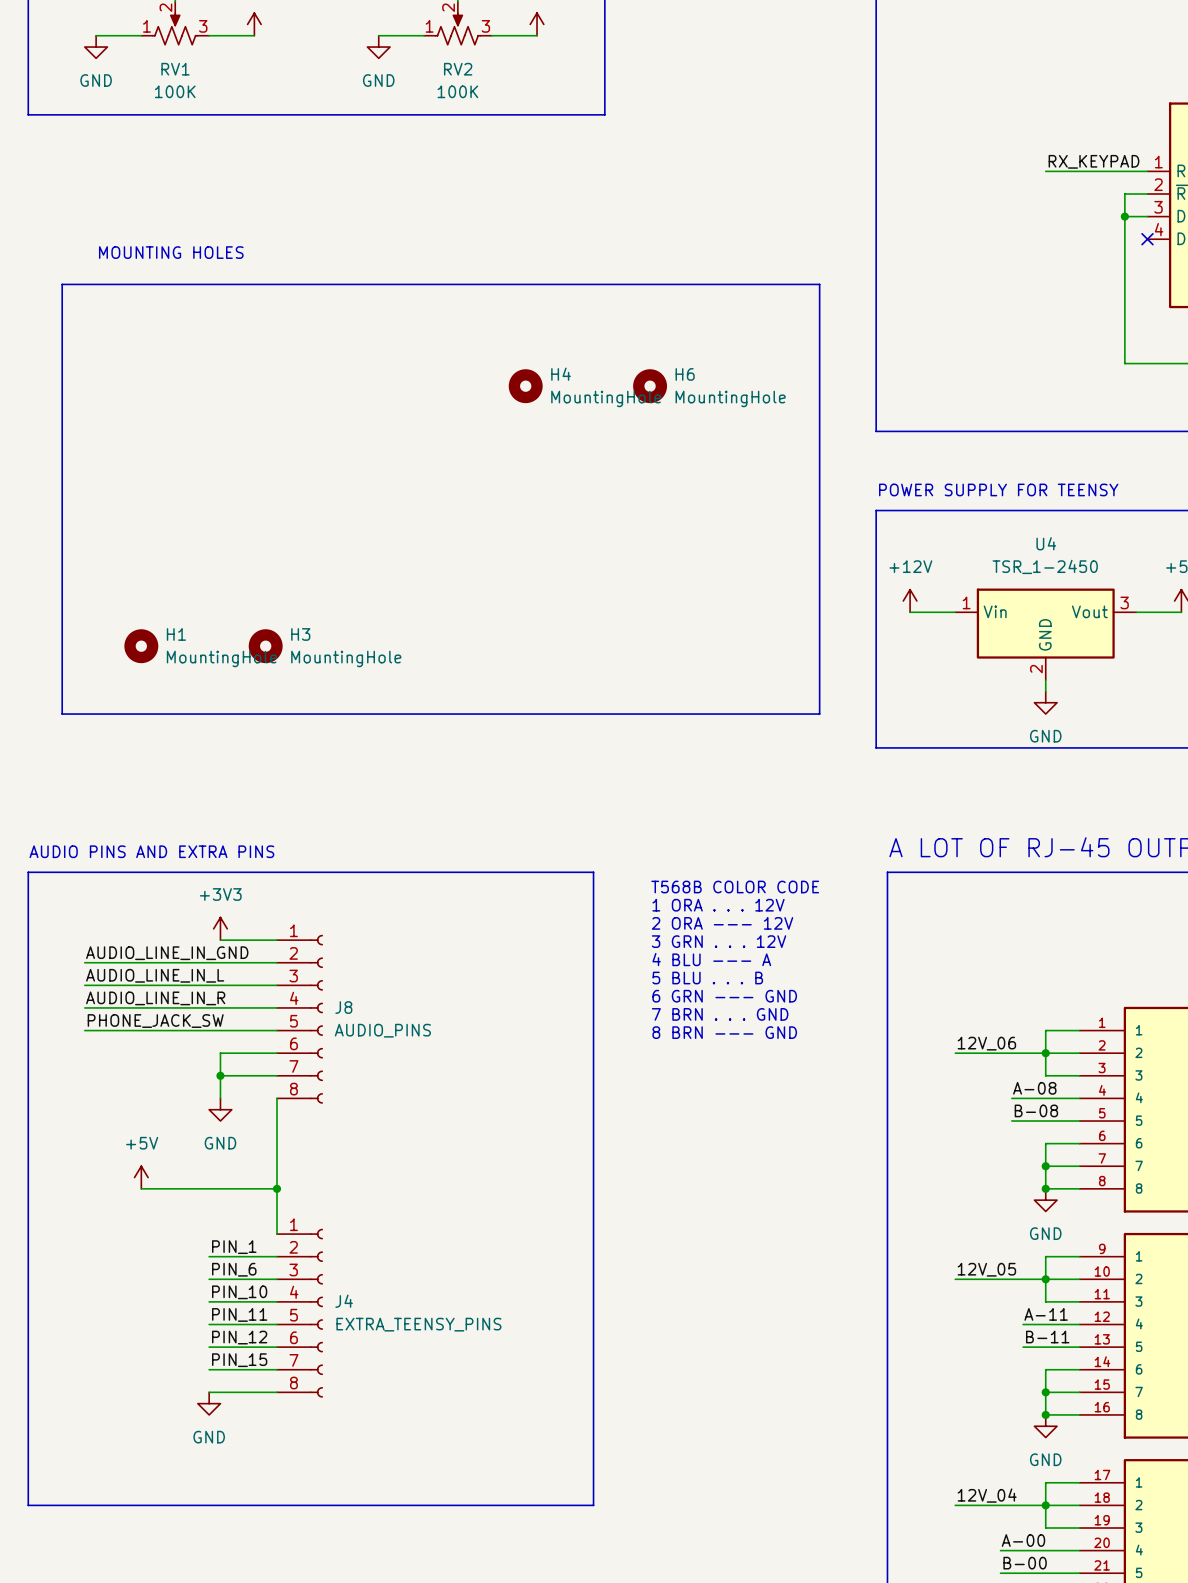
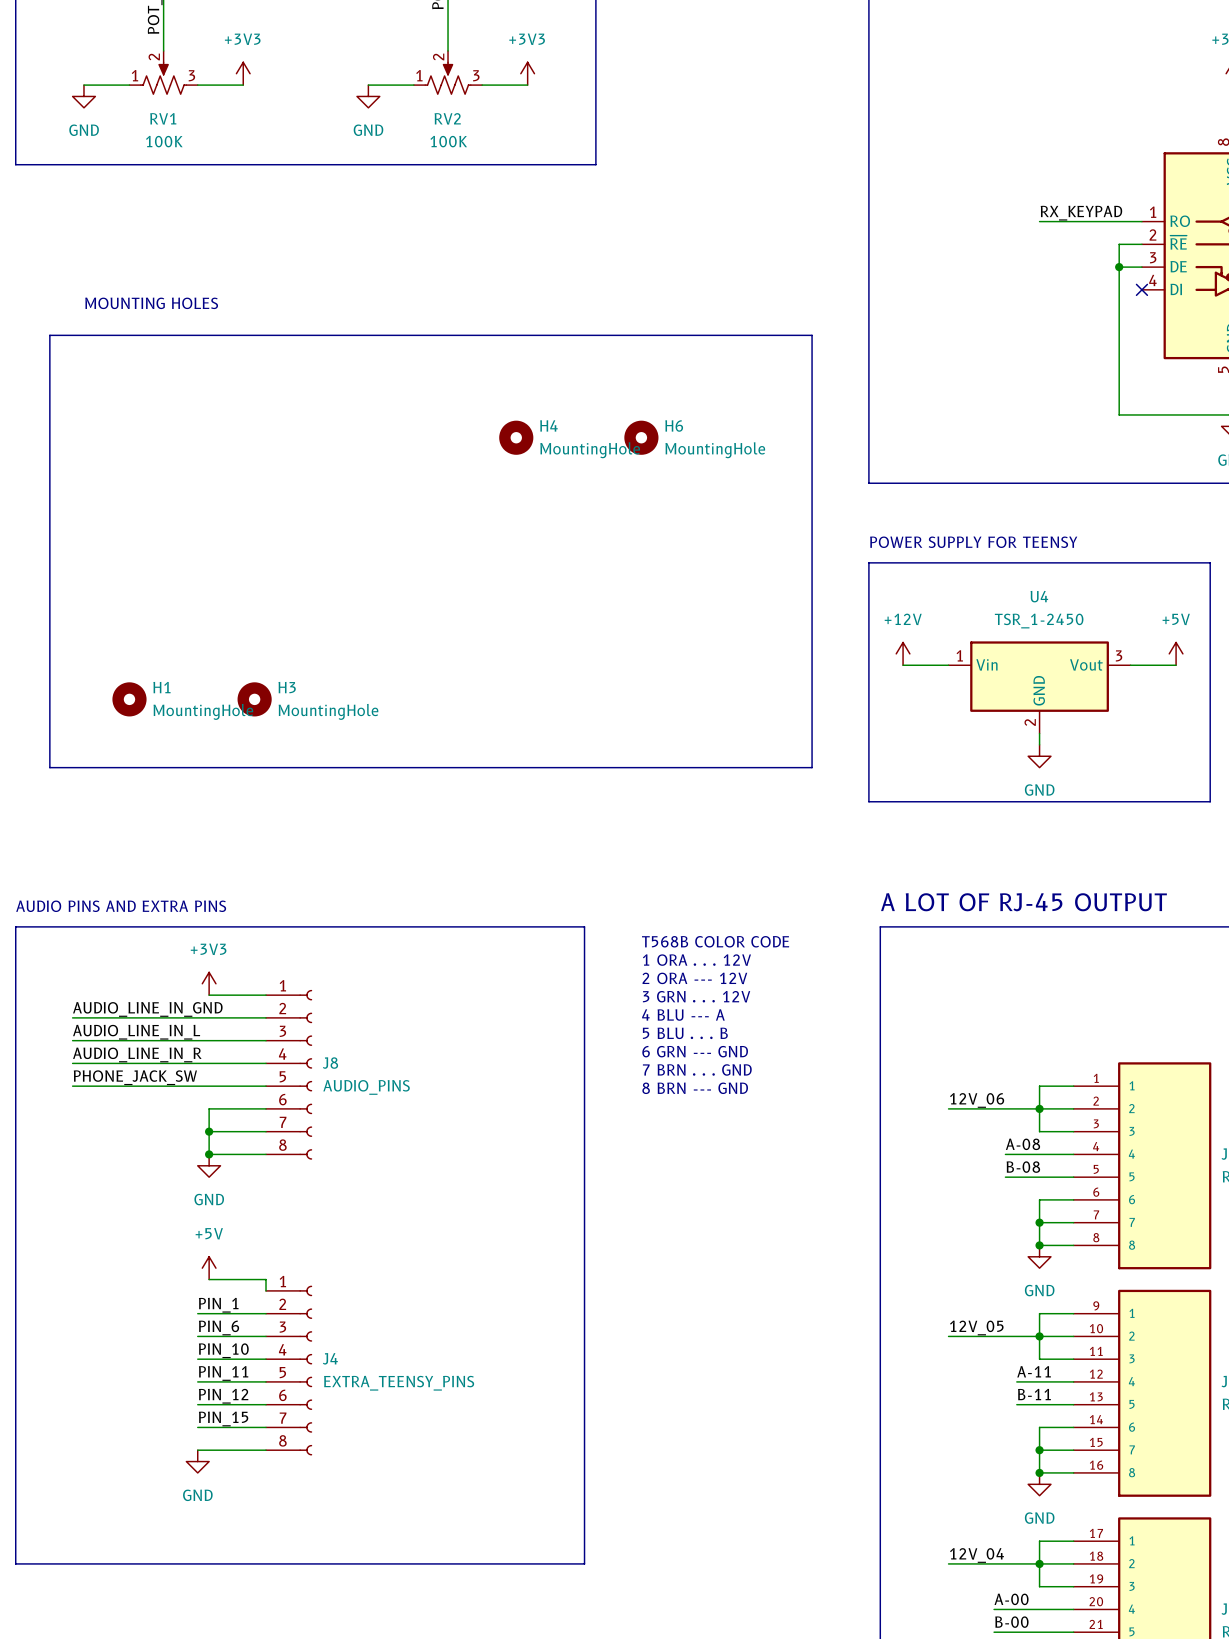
junction: none -> (209, 1154)
wire: (276, 1098) (276, 1222) -> (266, 1154) (209, 1154)
power symbol position: +5V (141, 1177) -> +5V (209, 1268)
wire: (141, 1188) (276, 1188) -> none
junction: (276, 1188) -> none
wire: none -> (209, 1279) (266, 1279)

